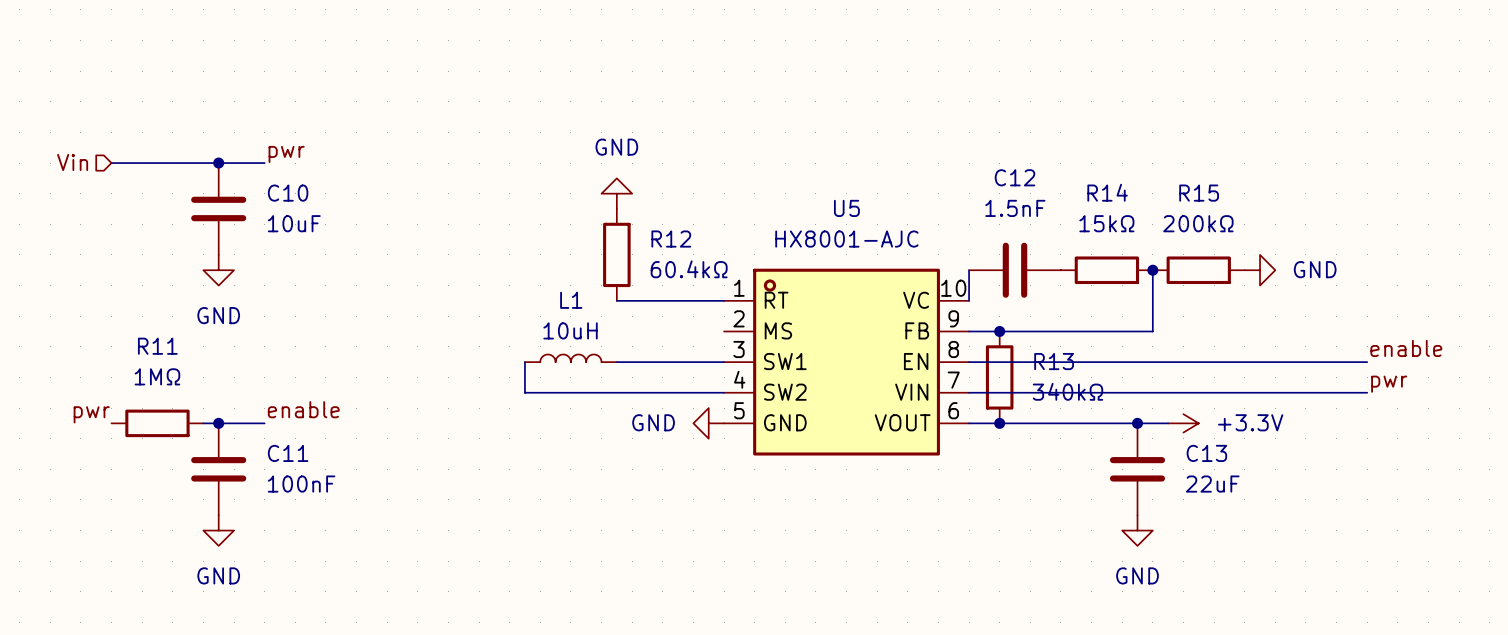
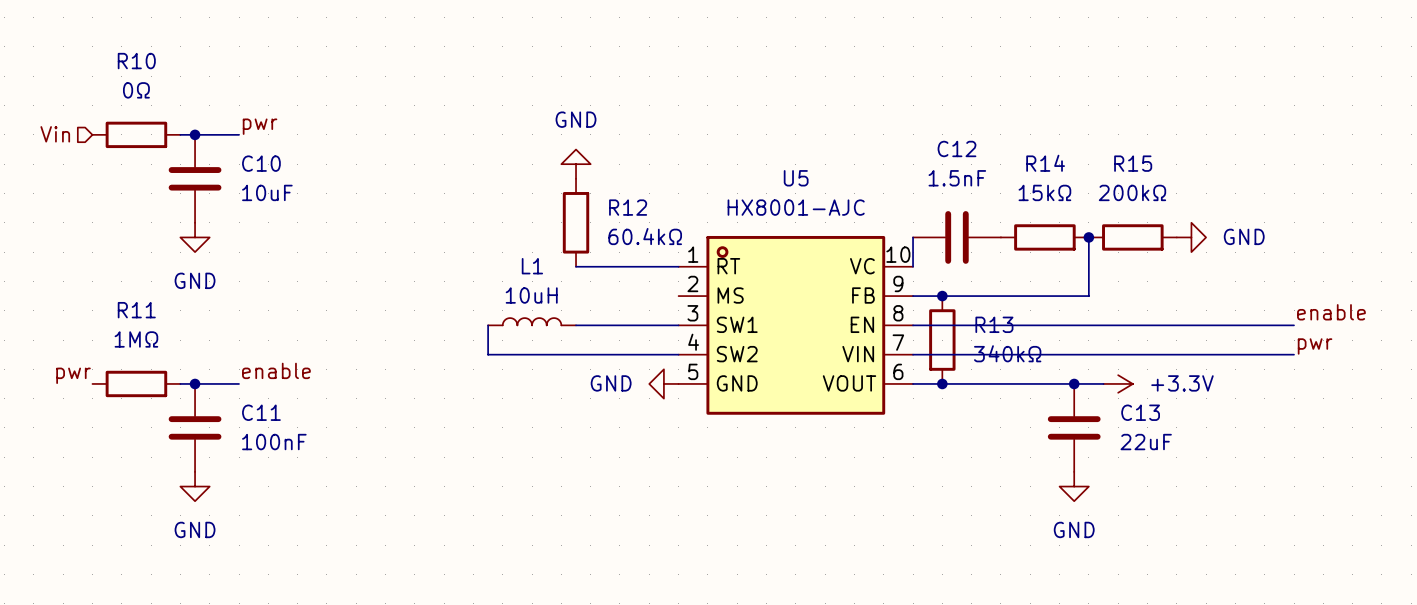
wire: (111, 163) (203, 163) -> none
R10: none -> 0Ω (136, 134)

